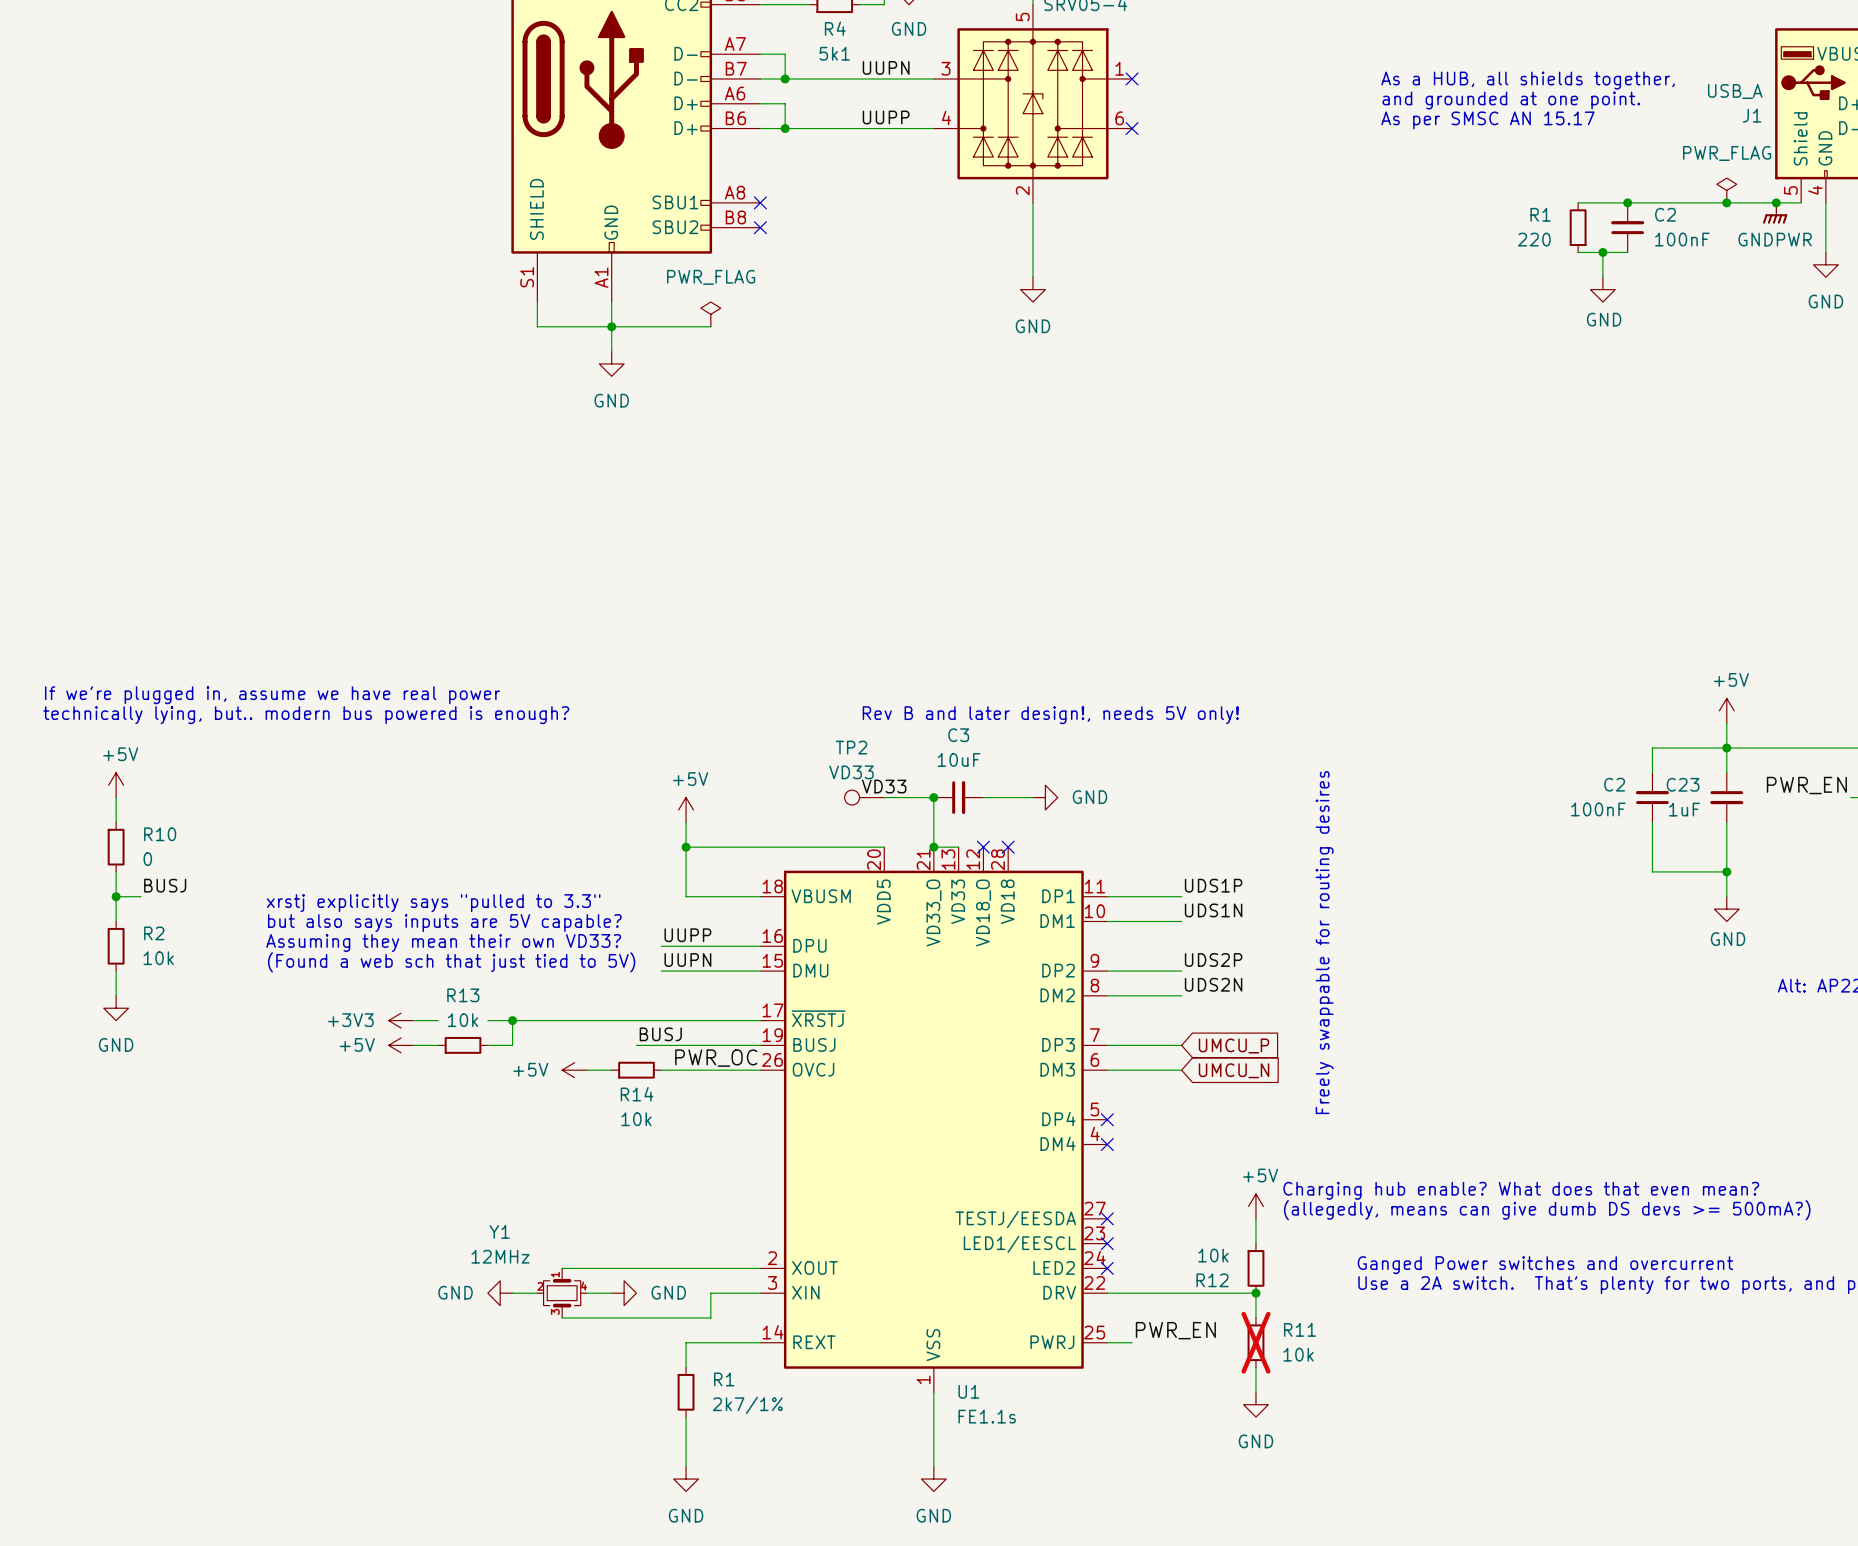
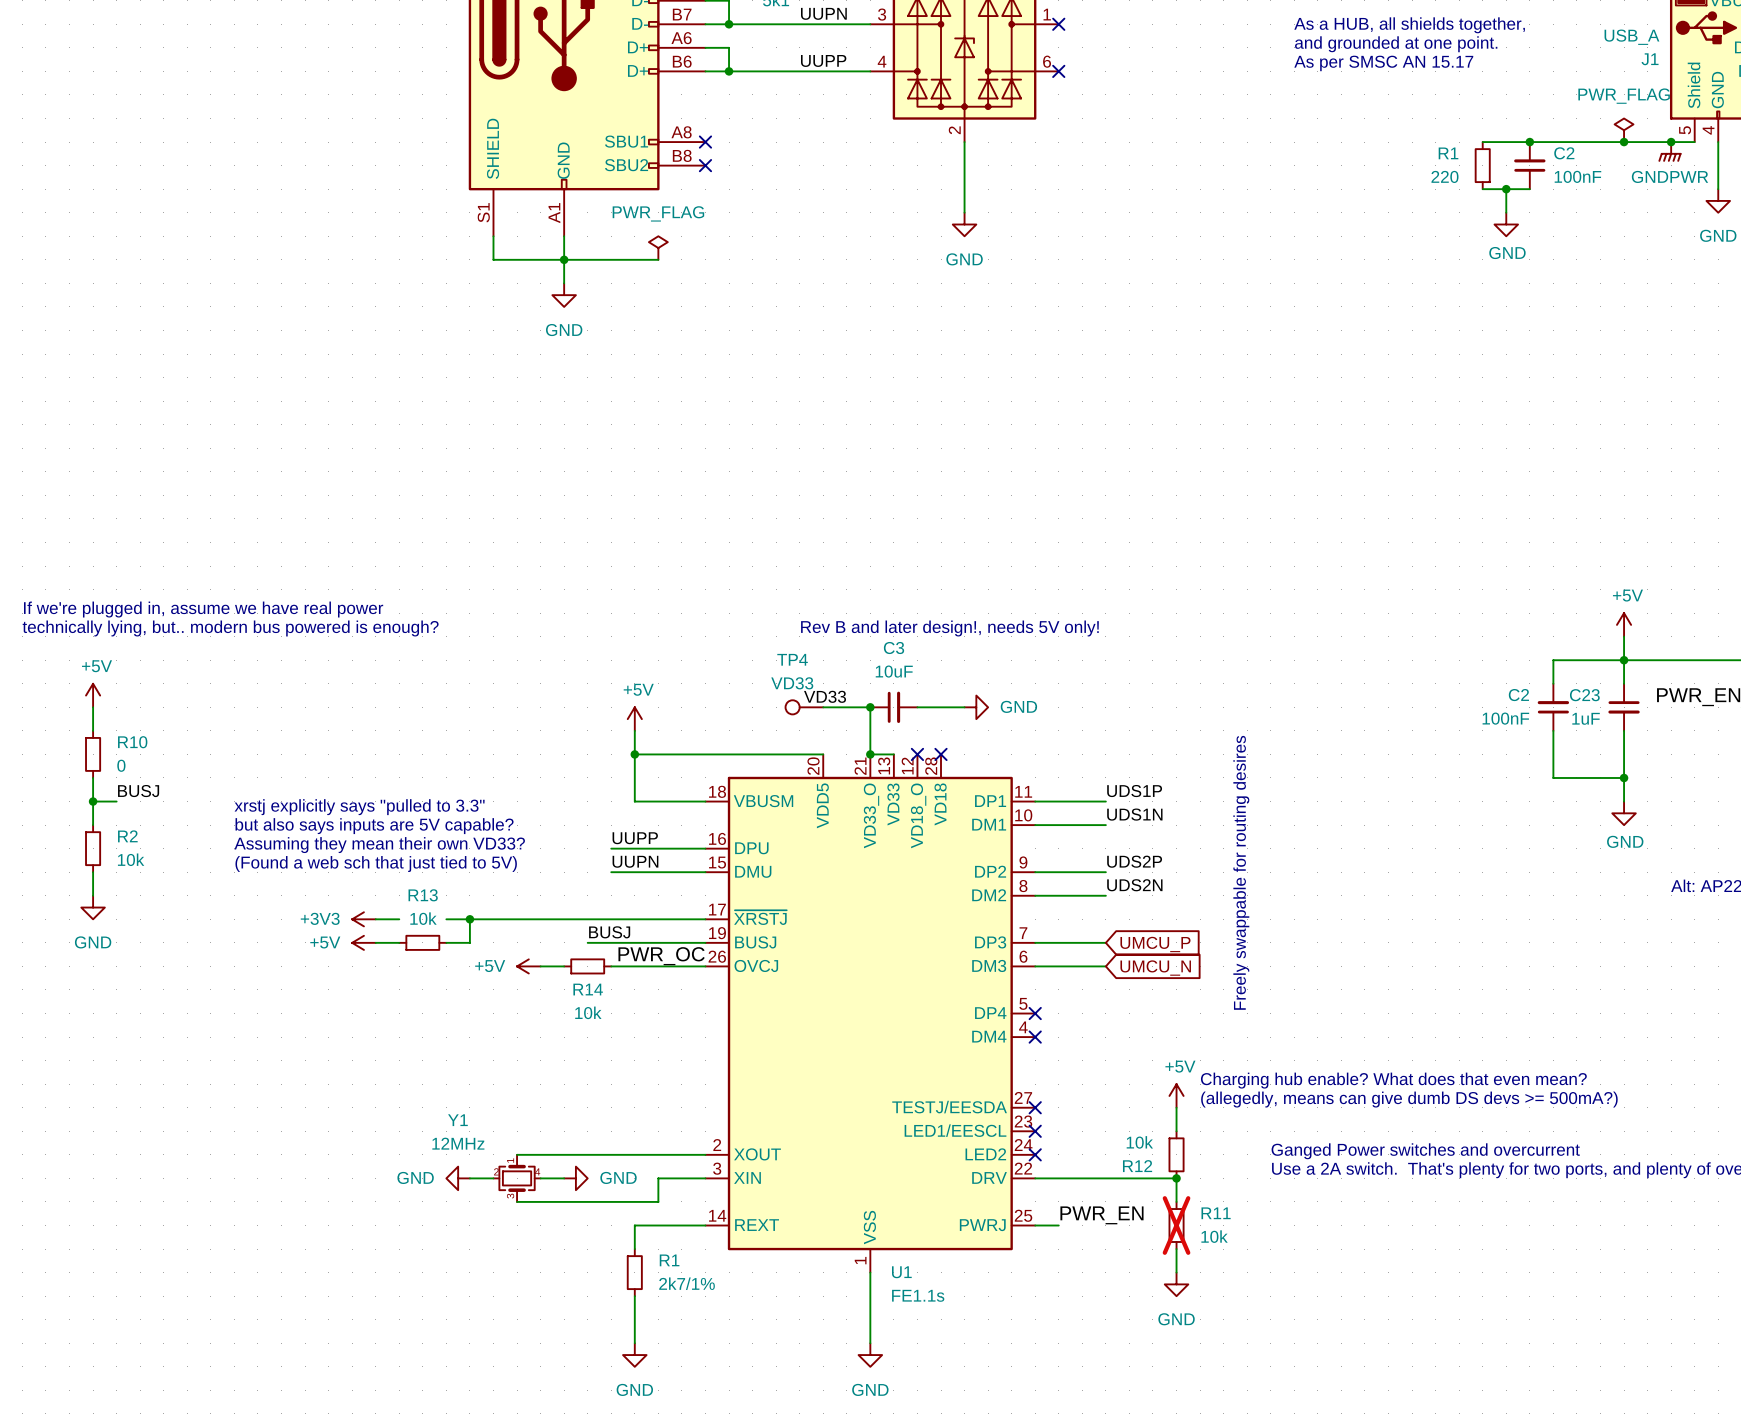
TP2 name: TP2 (851, 747) -> TP4 (792, 659)

